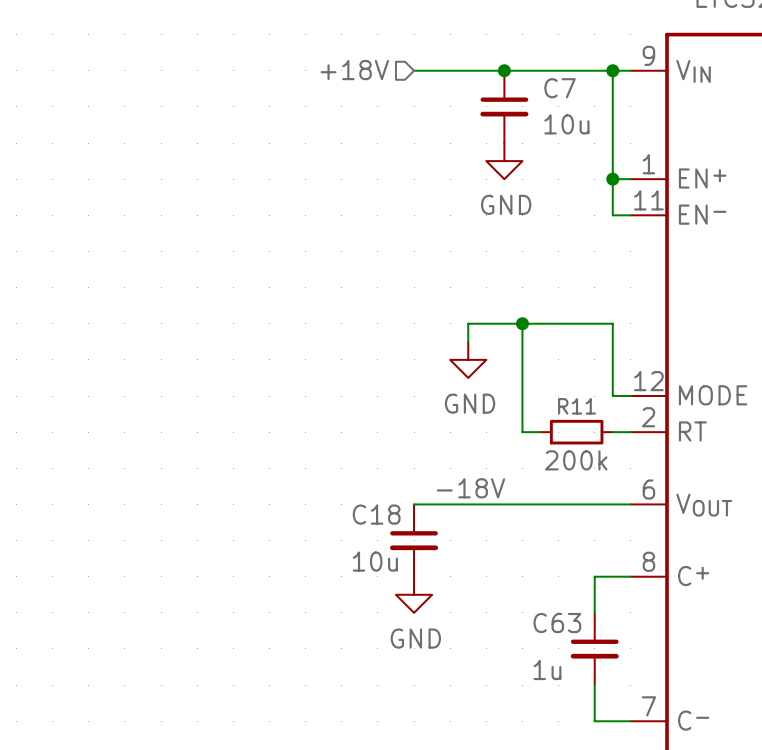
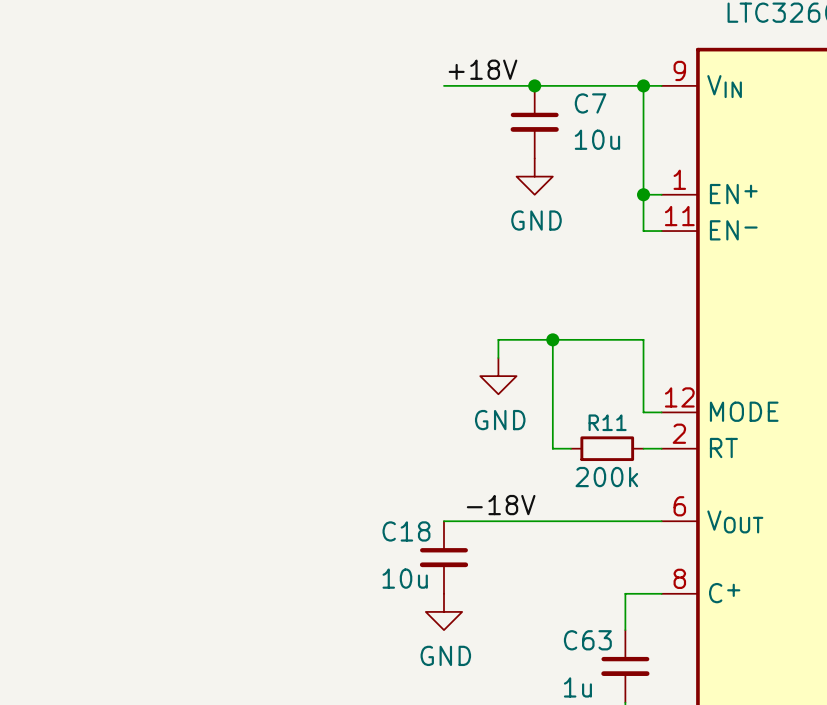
label: none -> +18V (483, 69)
hierarchical label: +18V (354, 70) -> none

